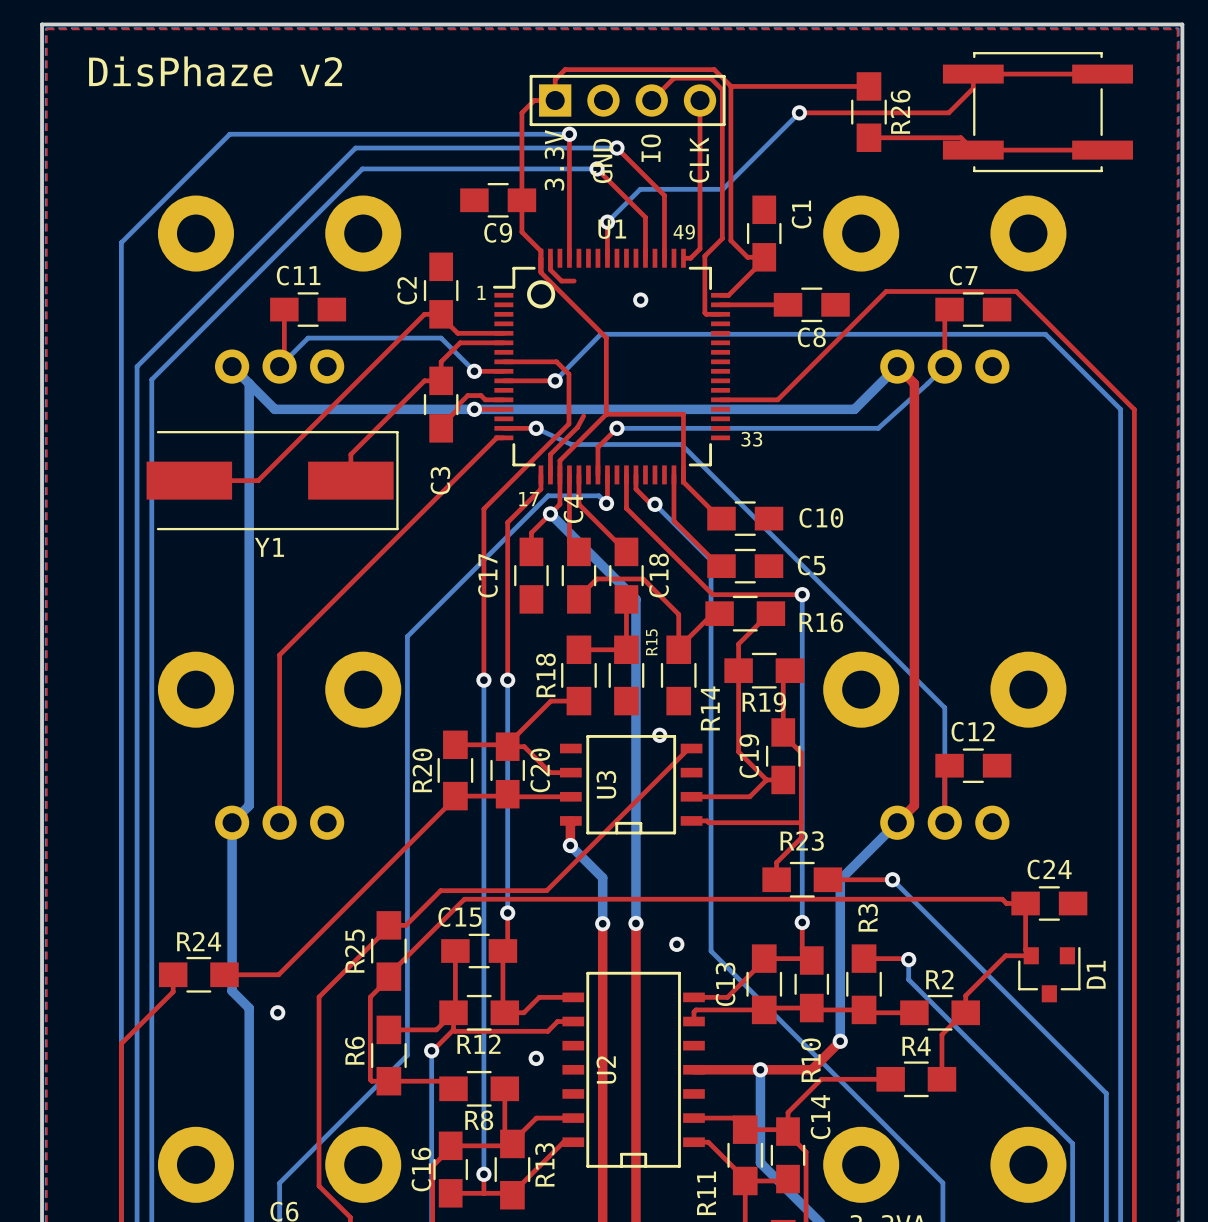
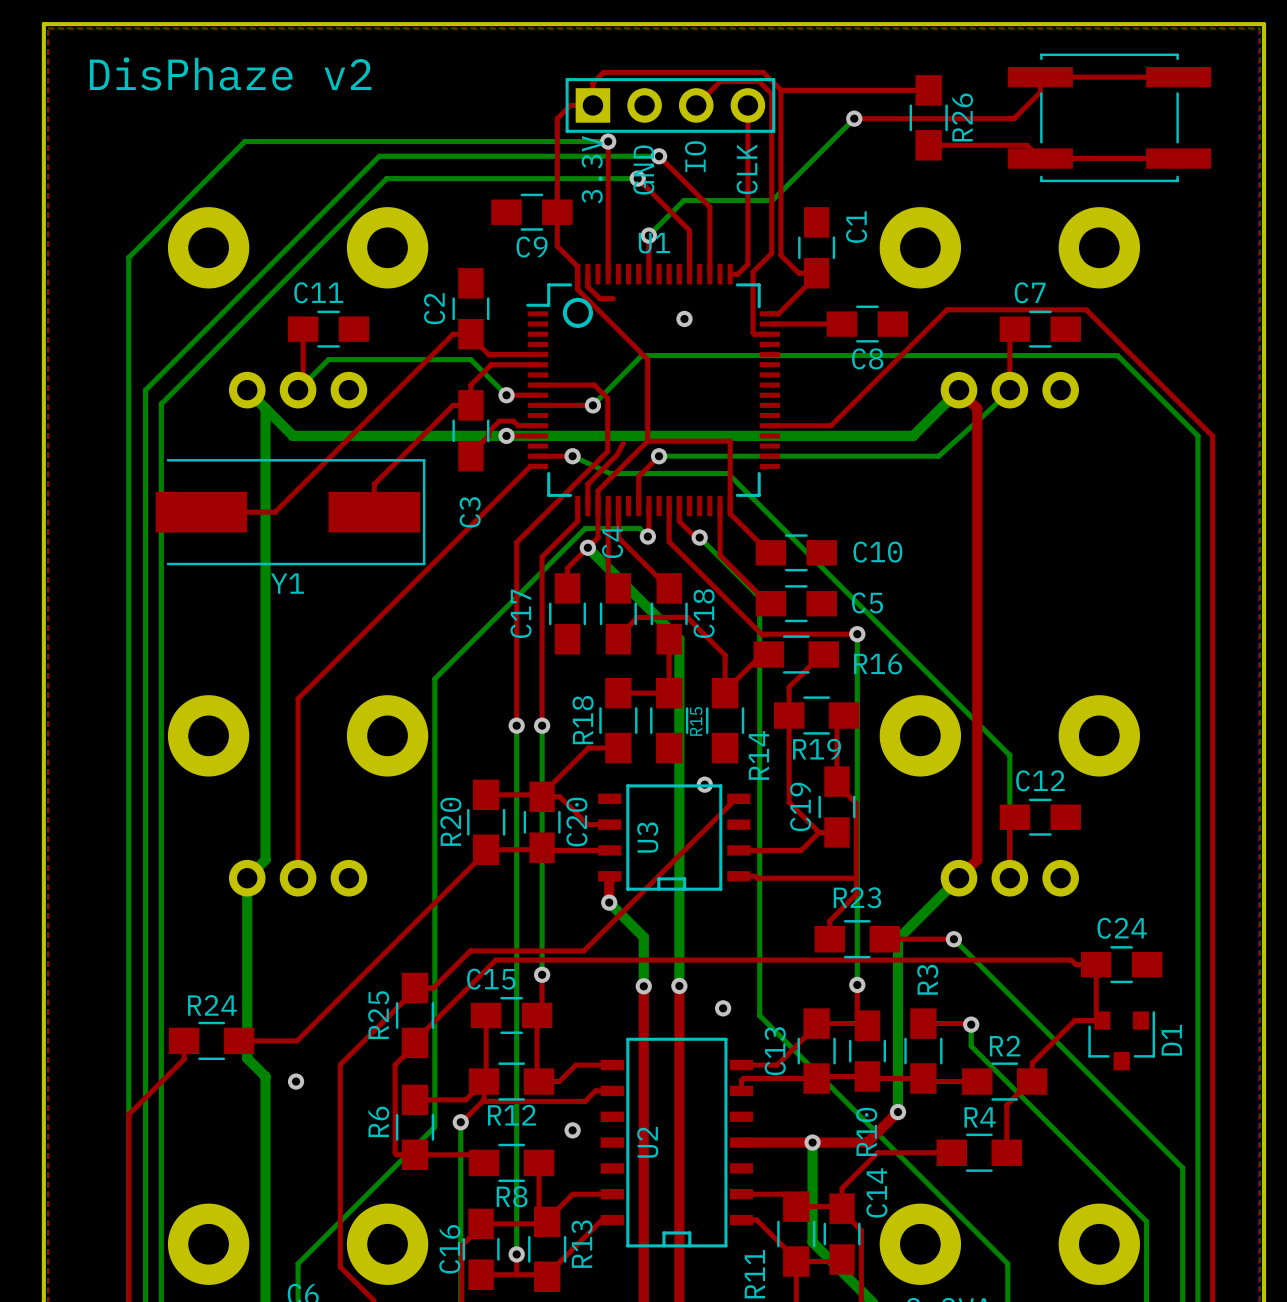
text: 49 (684, 232) -> none
text: 1 (481, 292) -> none
text: 33 (751, 439) -> none
text: 17 (529, 499) -> none
R15 name position: R15 (651, 642) -> R15 (696, 721)

